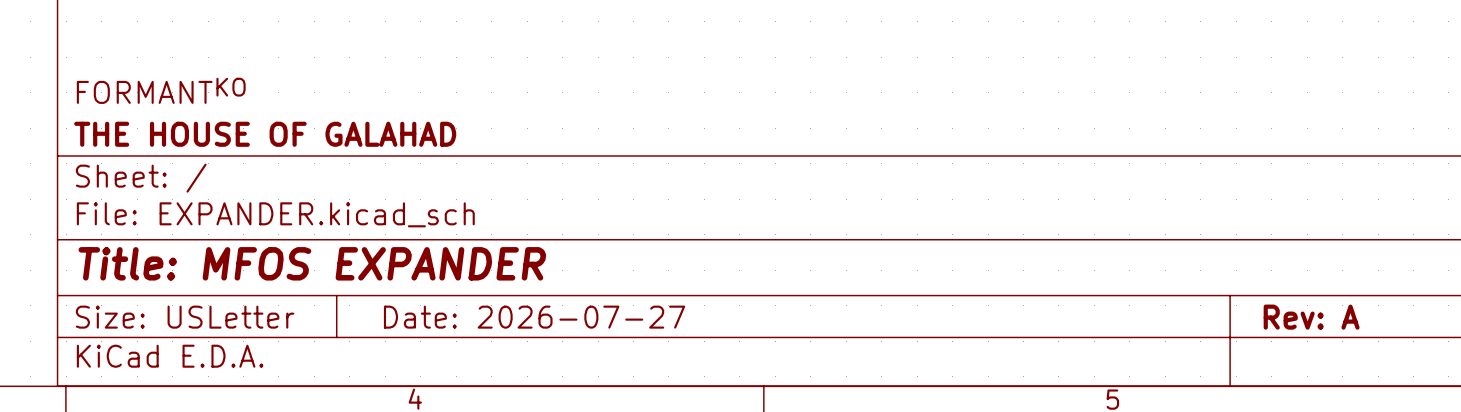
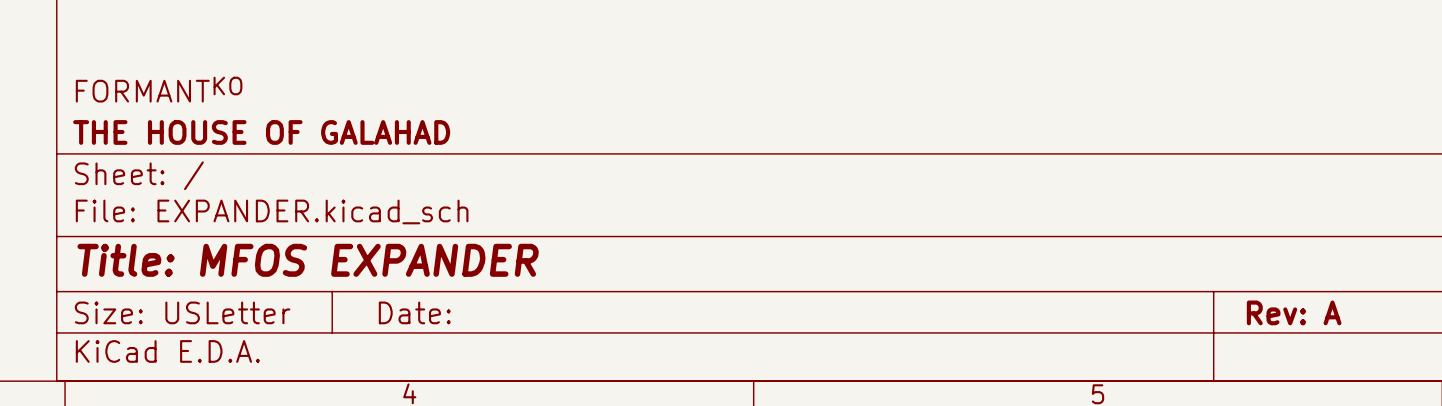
title block: Date: 2026-07-27 (534, 317) -> Date: (414, 312)

